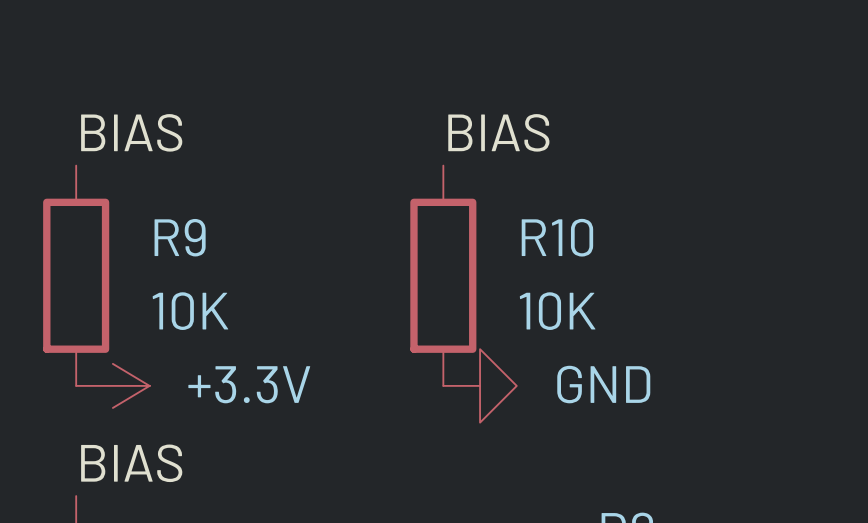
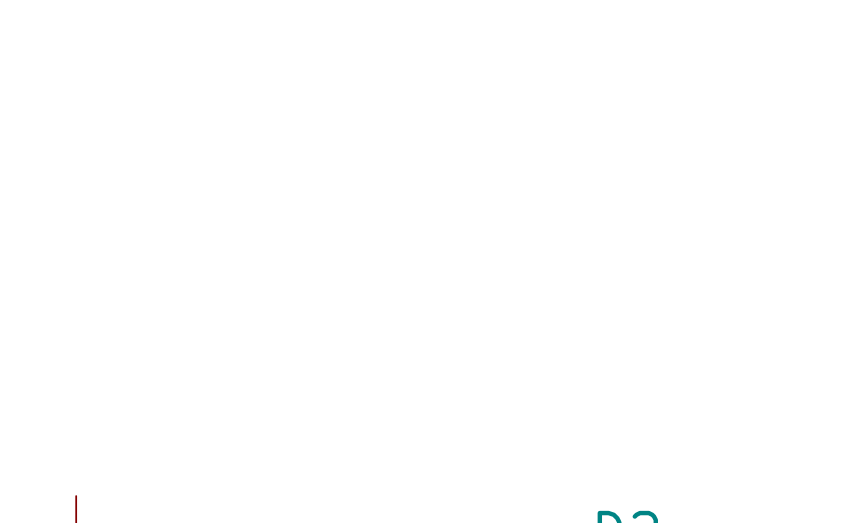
label: BIAS (131, 132) -> none
label: BIAS (498, 132) -> none
R9: 10K (76, 275) -> none
R10: 10K (443, 275) -> none
power symbol: +3.3V (112, 385) -> none
power symbol: GND (480, 385) -> none
label: BIAS (131, 463) -> none

